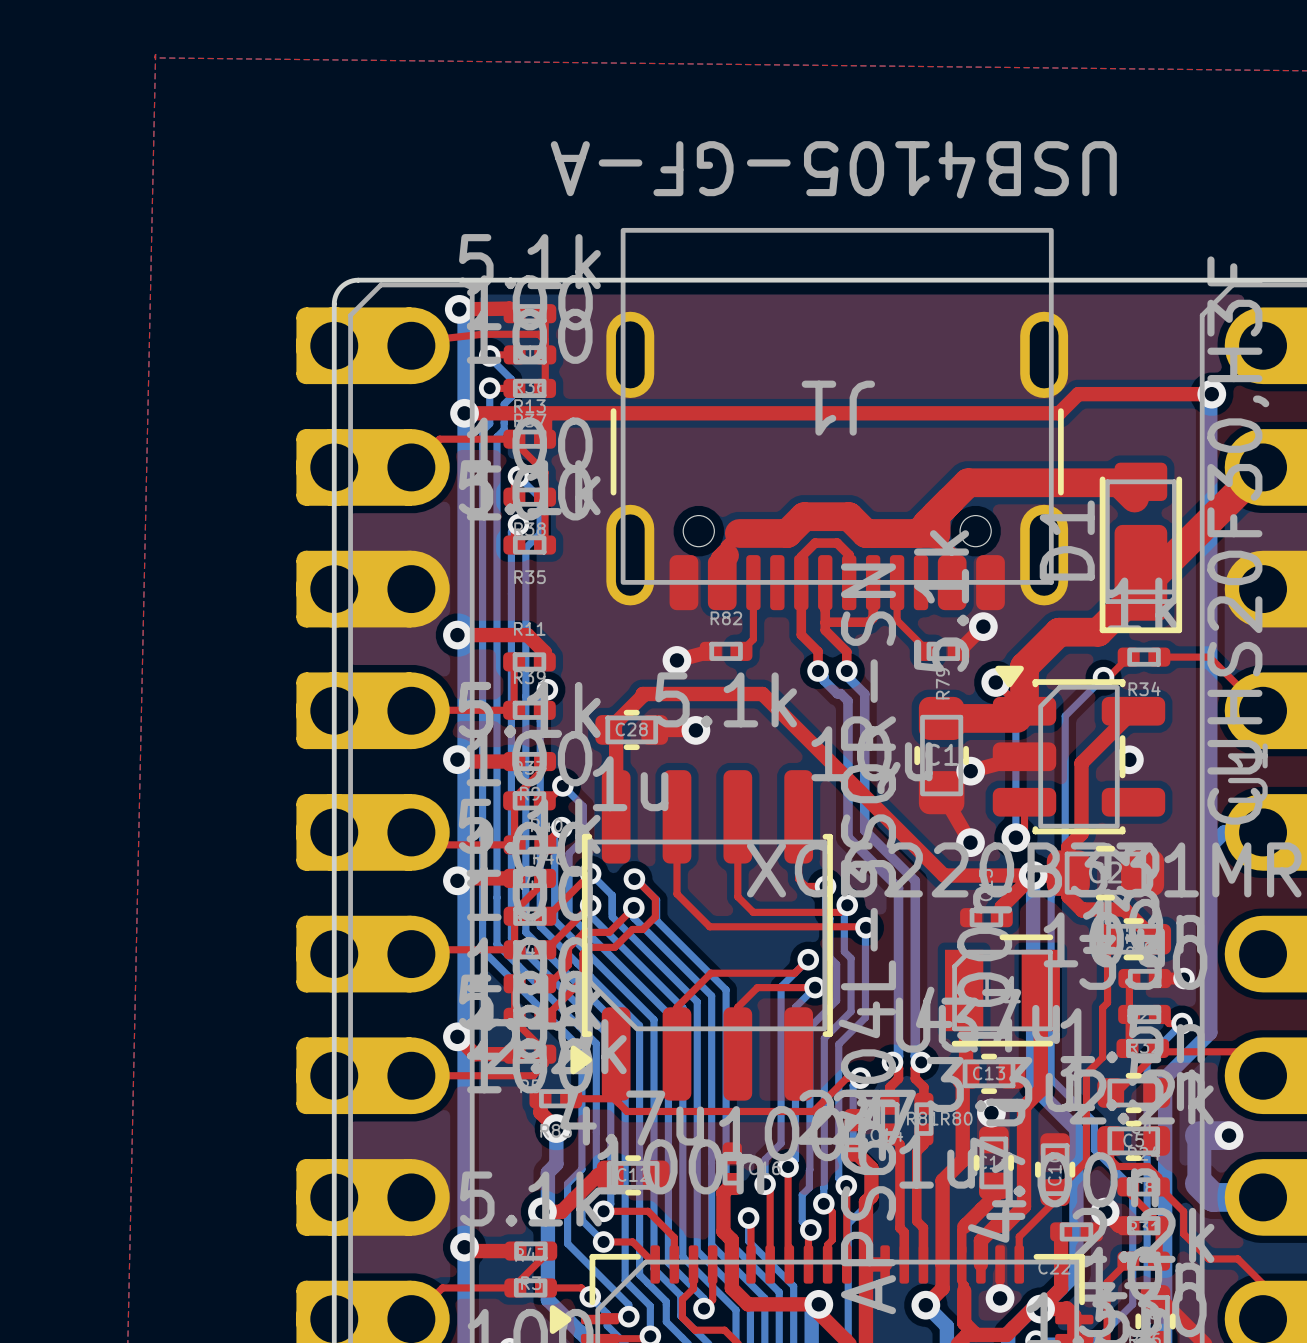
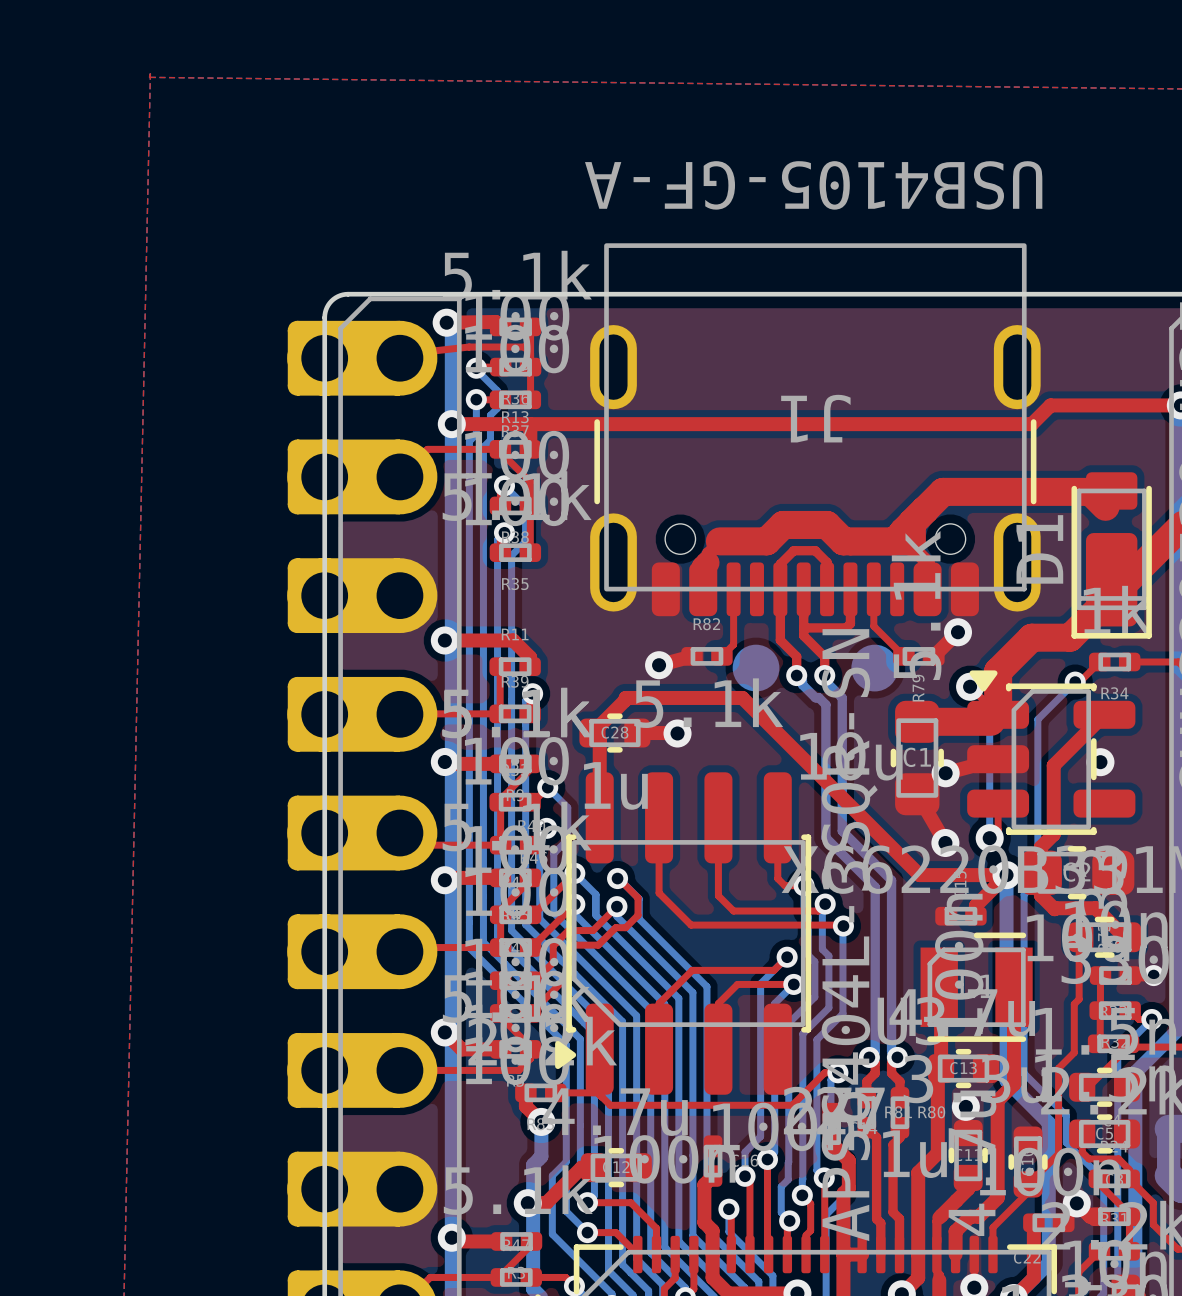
part: none -> (756, 668)
part: none -> (874, 668)

